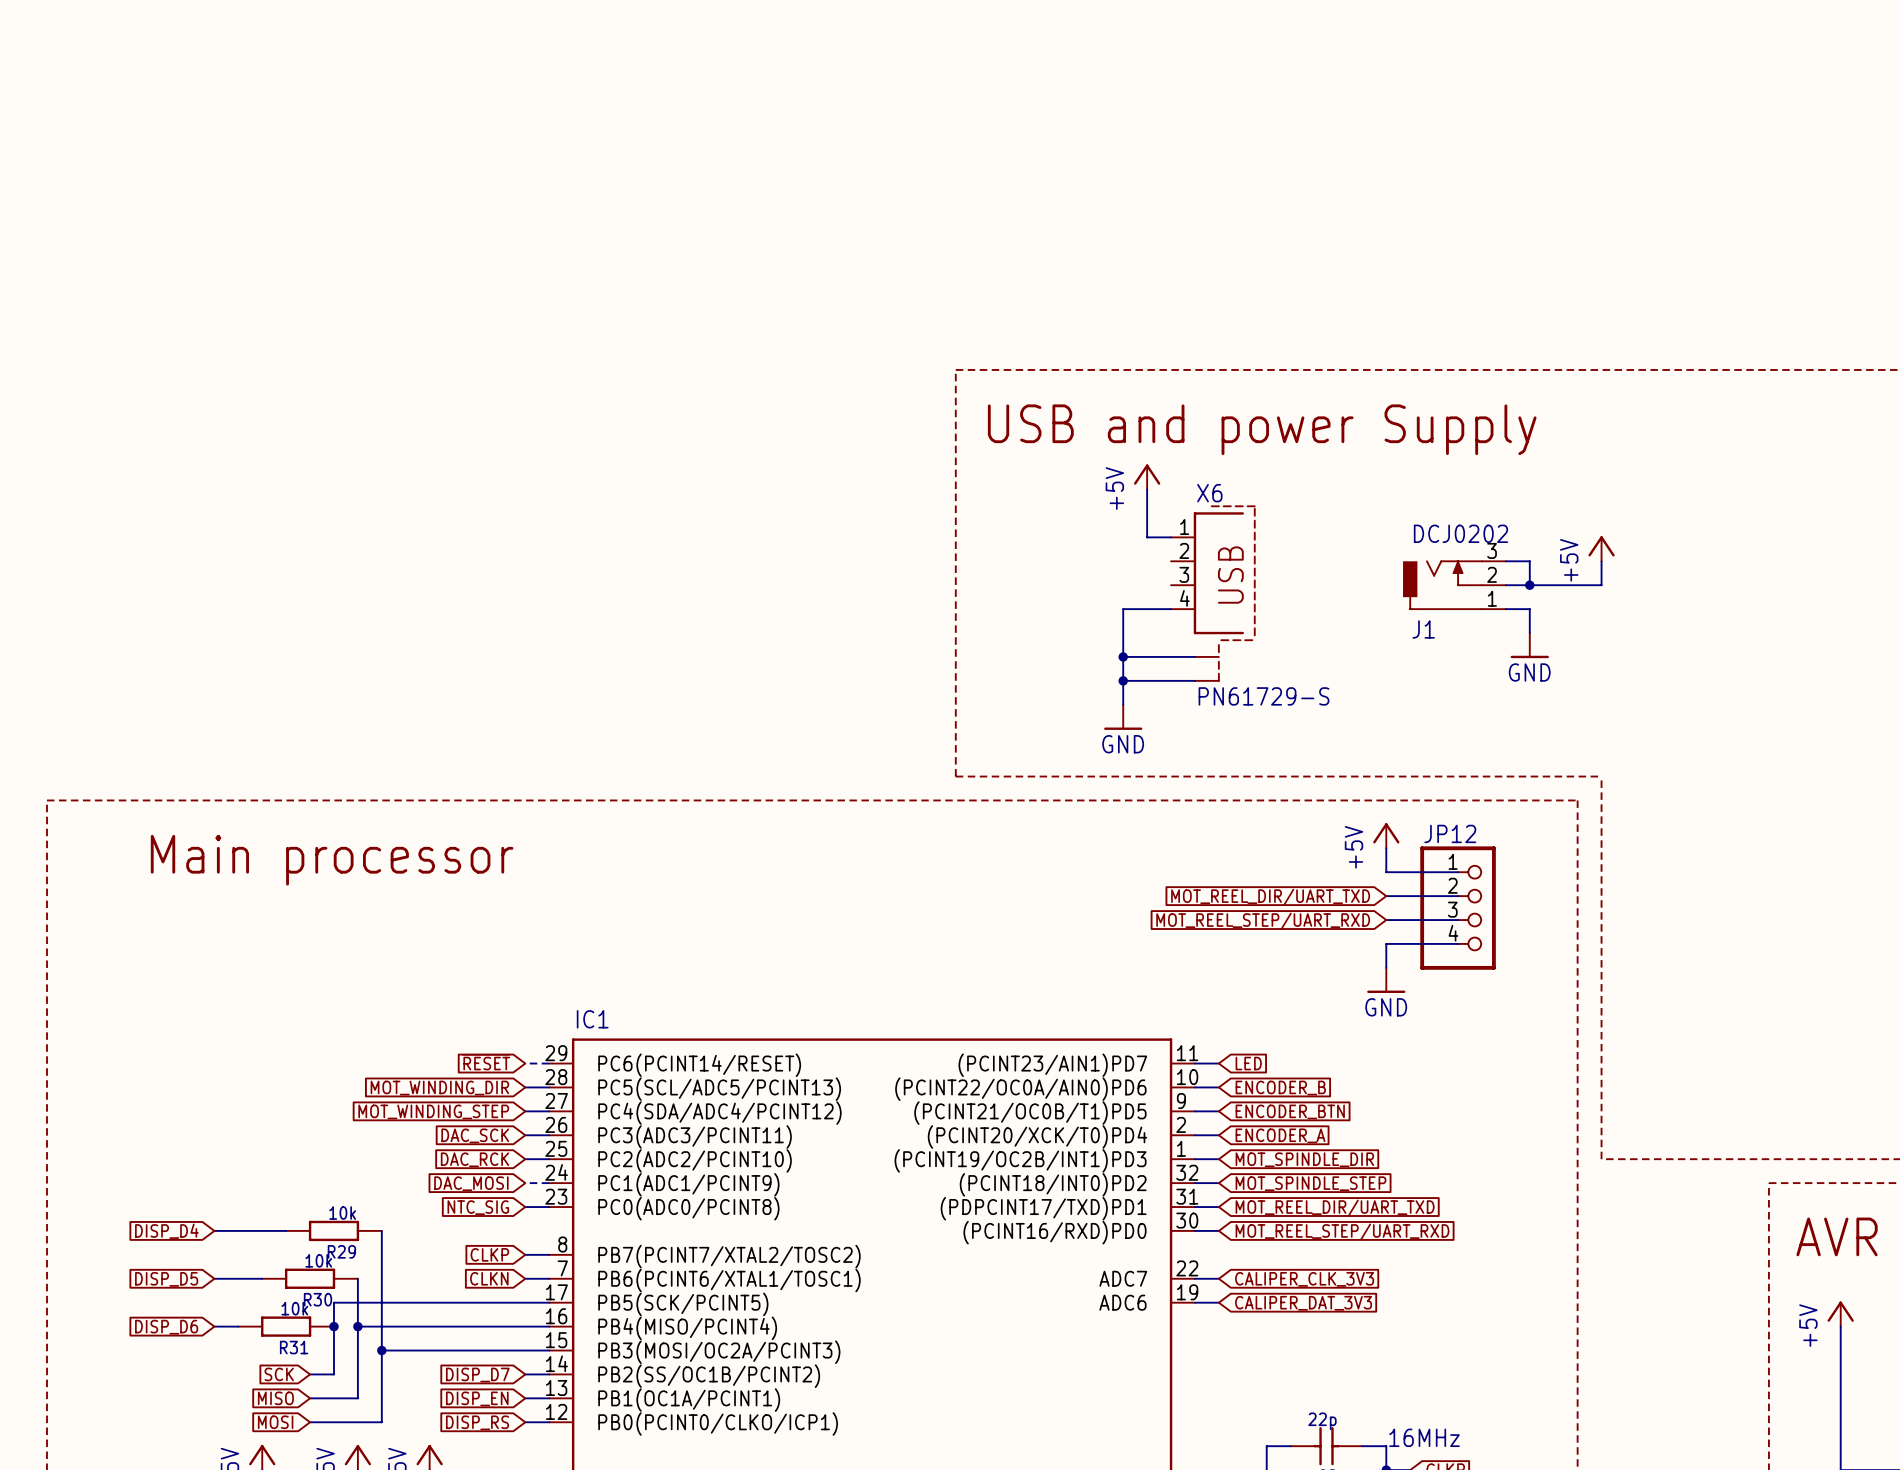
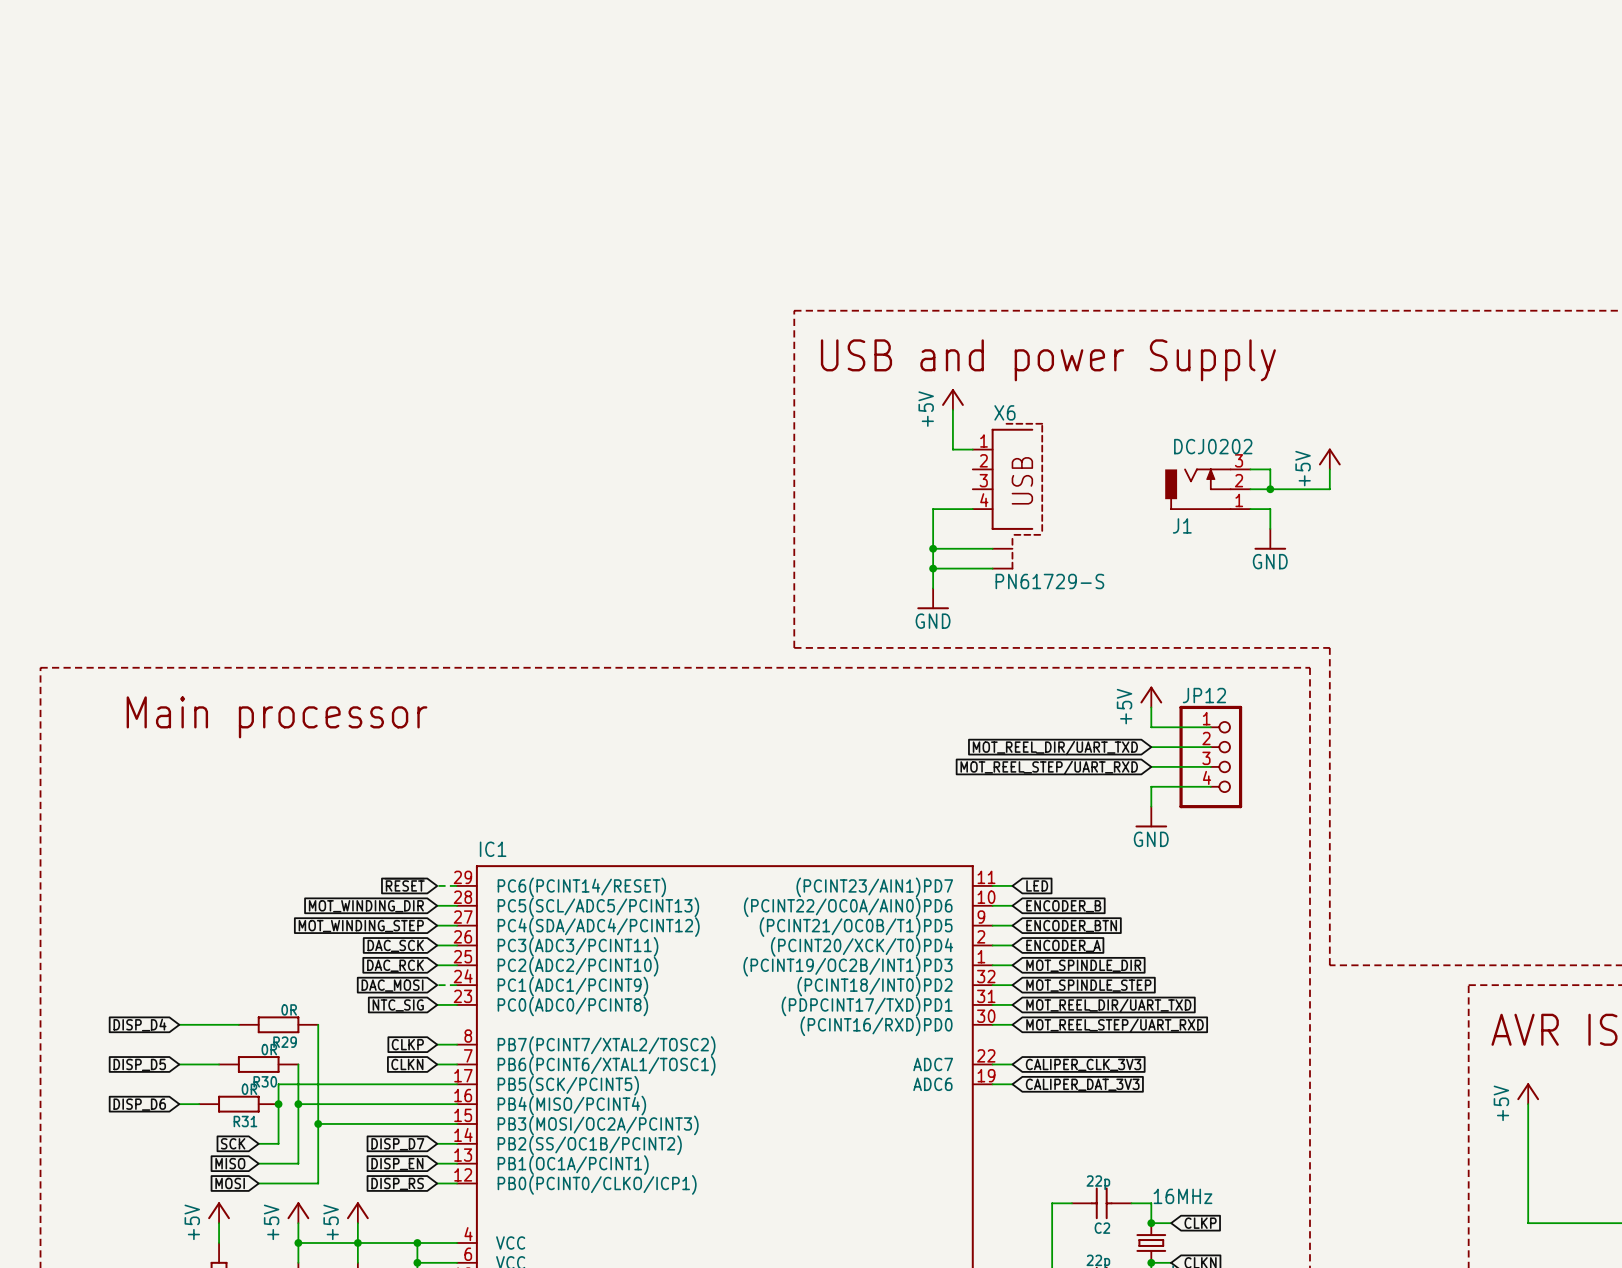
R29 value: 10k (342, 1213) -> 0R (289, 1009)
R30 value: 10k (318, 1260) -> 0R (269, 1049)
R31 value: 10k (294, 1308) -> 0R (249, 1089)

